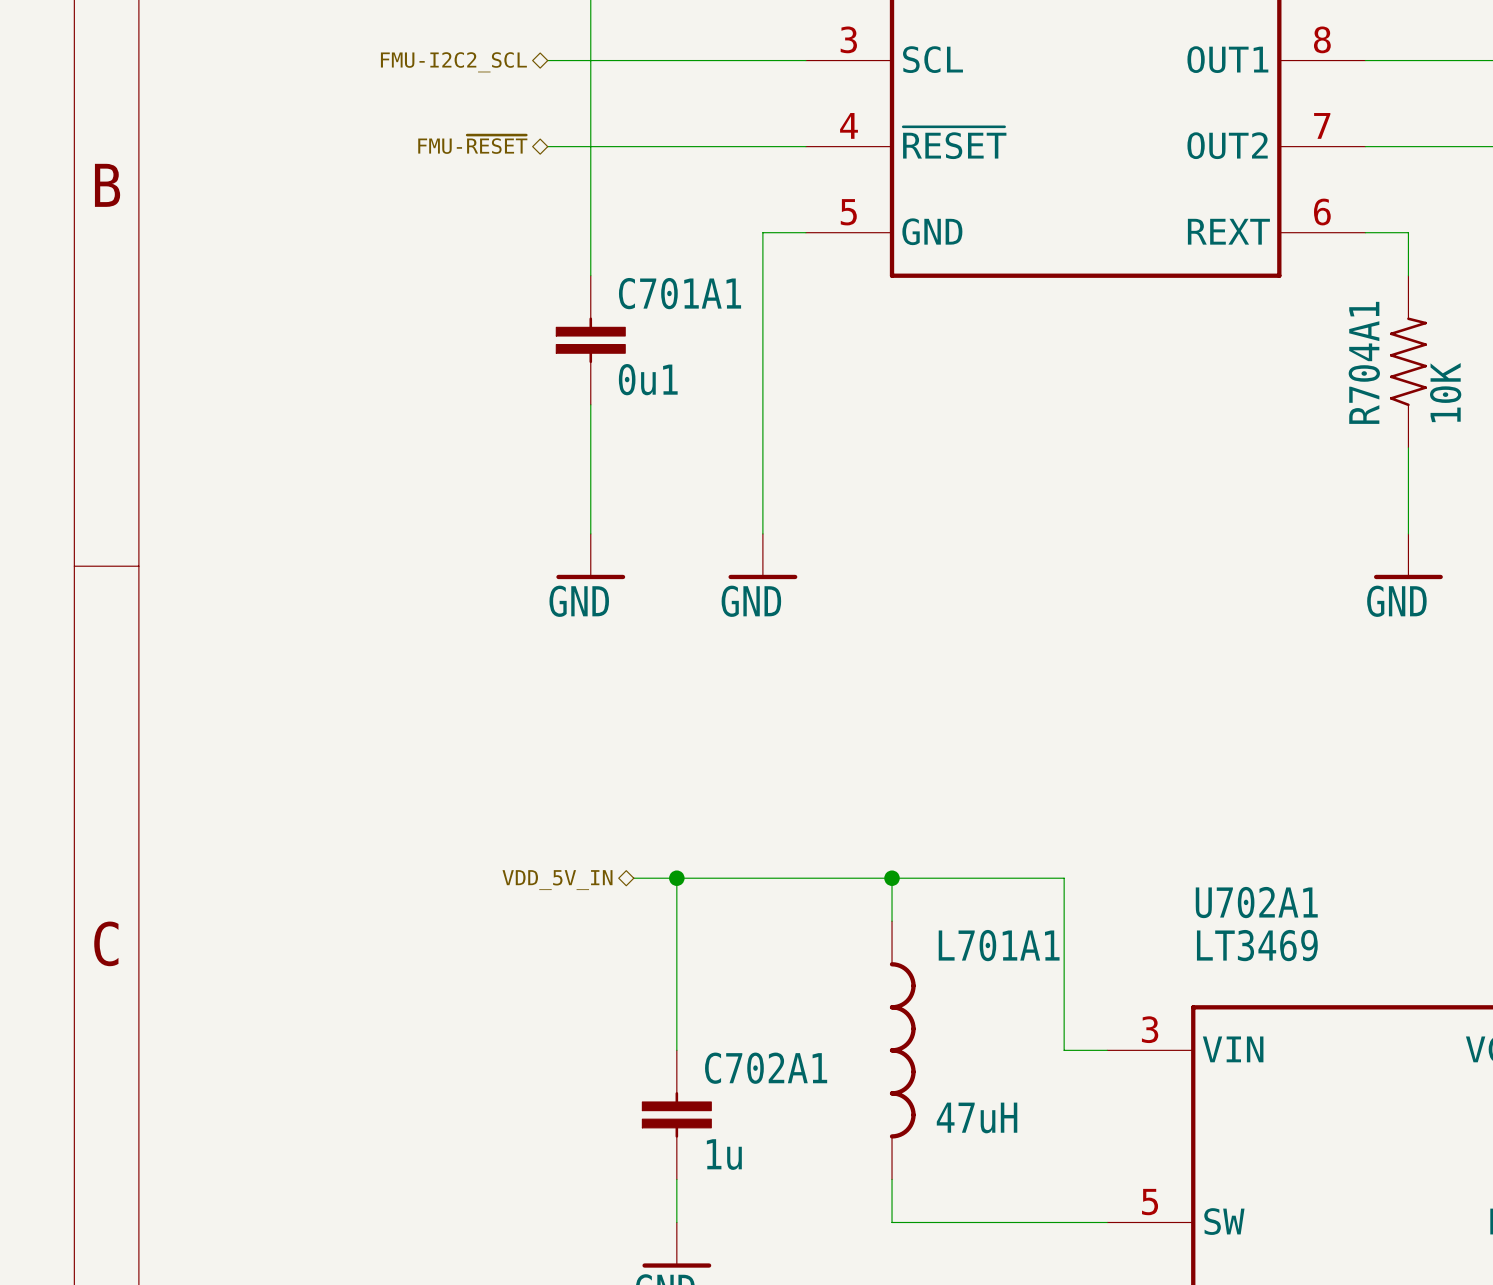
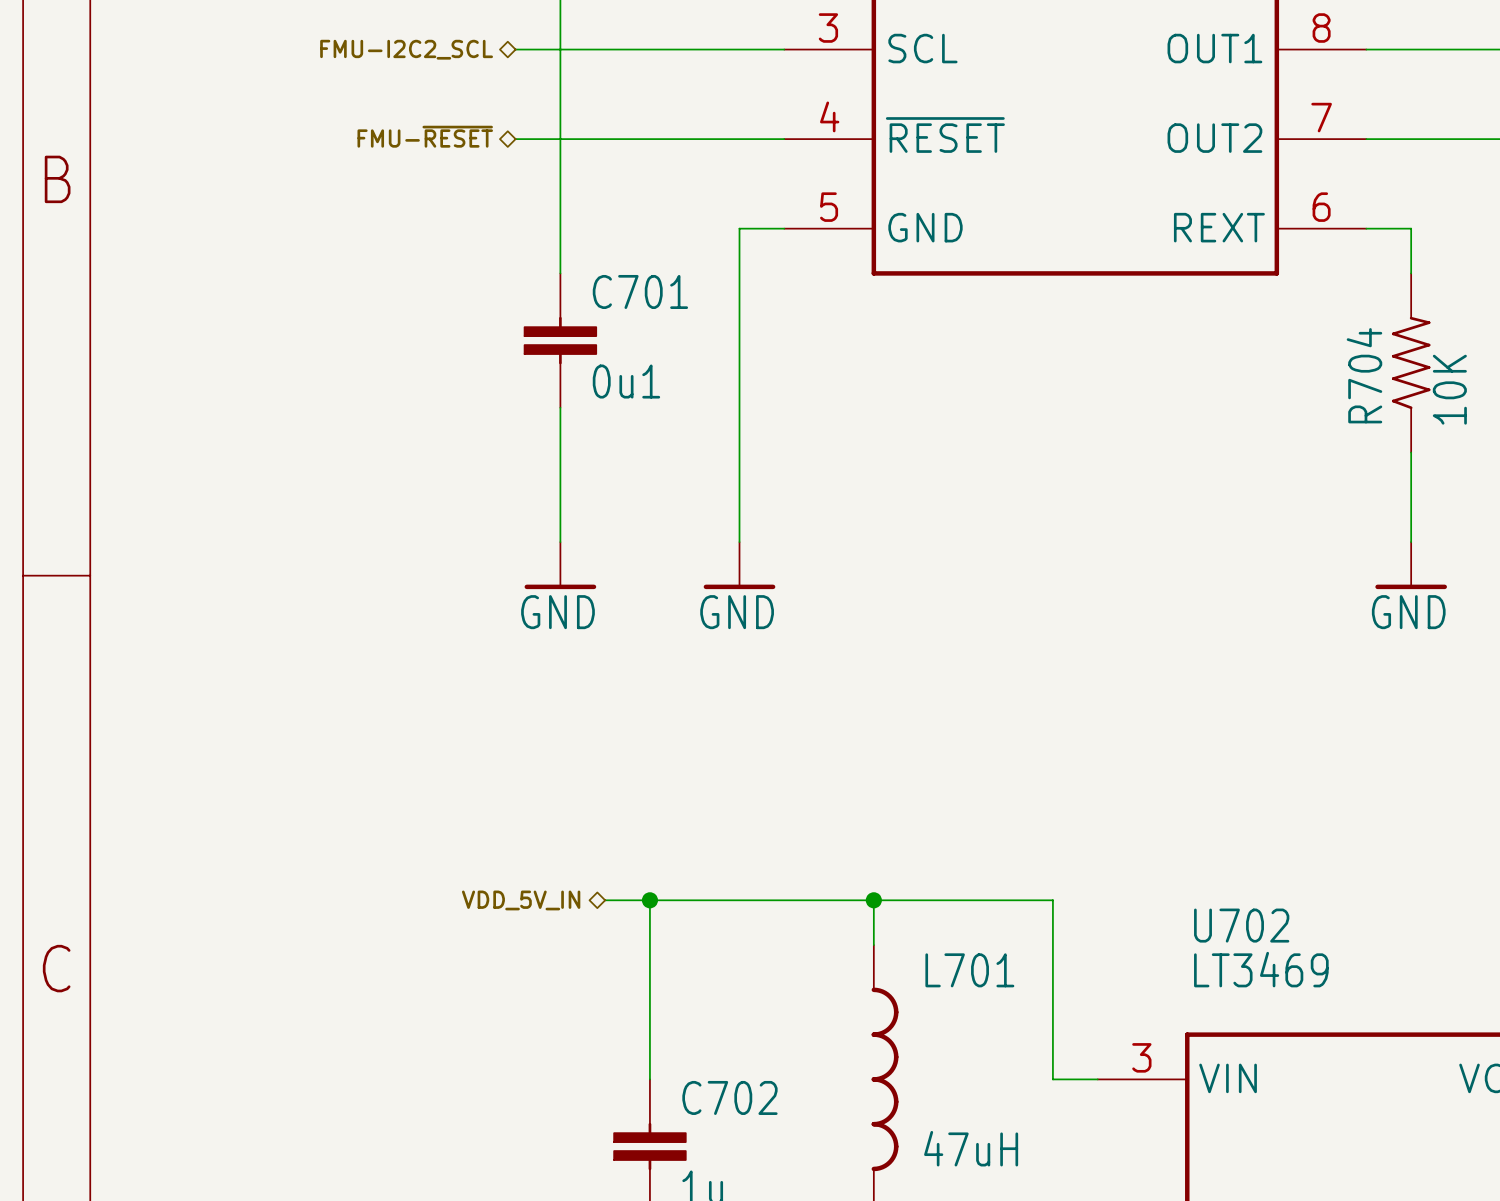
C701A1 name: C701A1 (680, 293) -> C701 (640, 291)
R704A1 name: R704A1 (1364, 362) -> R704 (1364, 375)
U702A1 name: U702A1 (1256, 902) -> U702 (1241, 925)
L701A1 name: L701A1 (999, 945) -> L701 (969, 970)
C702A1 name: C702A1 (766, 1068) -> C702 (729, 1097)

